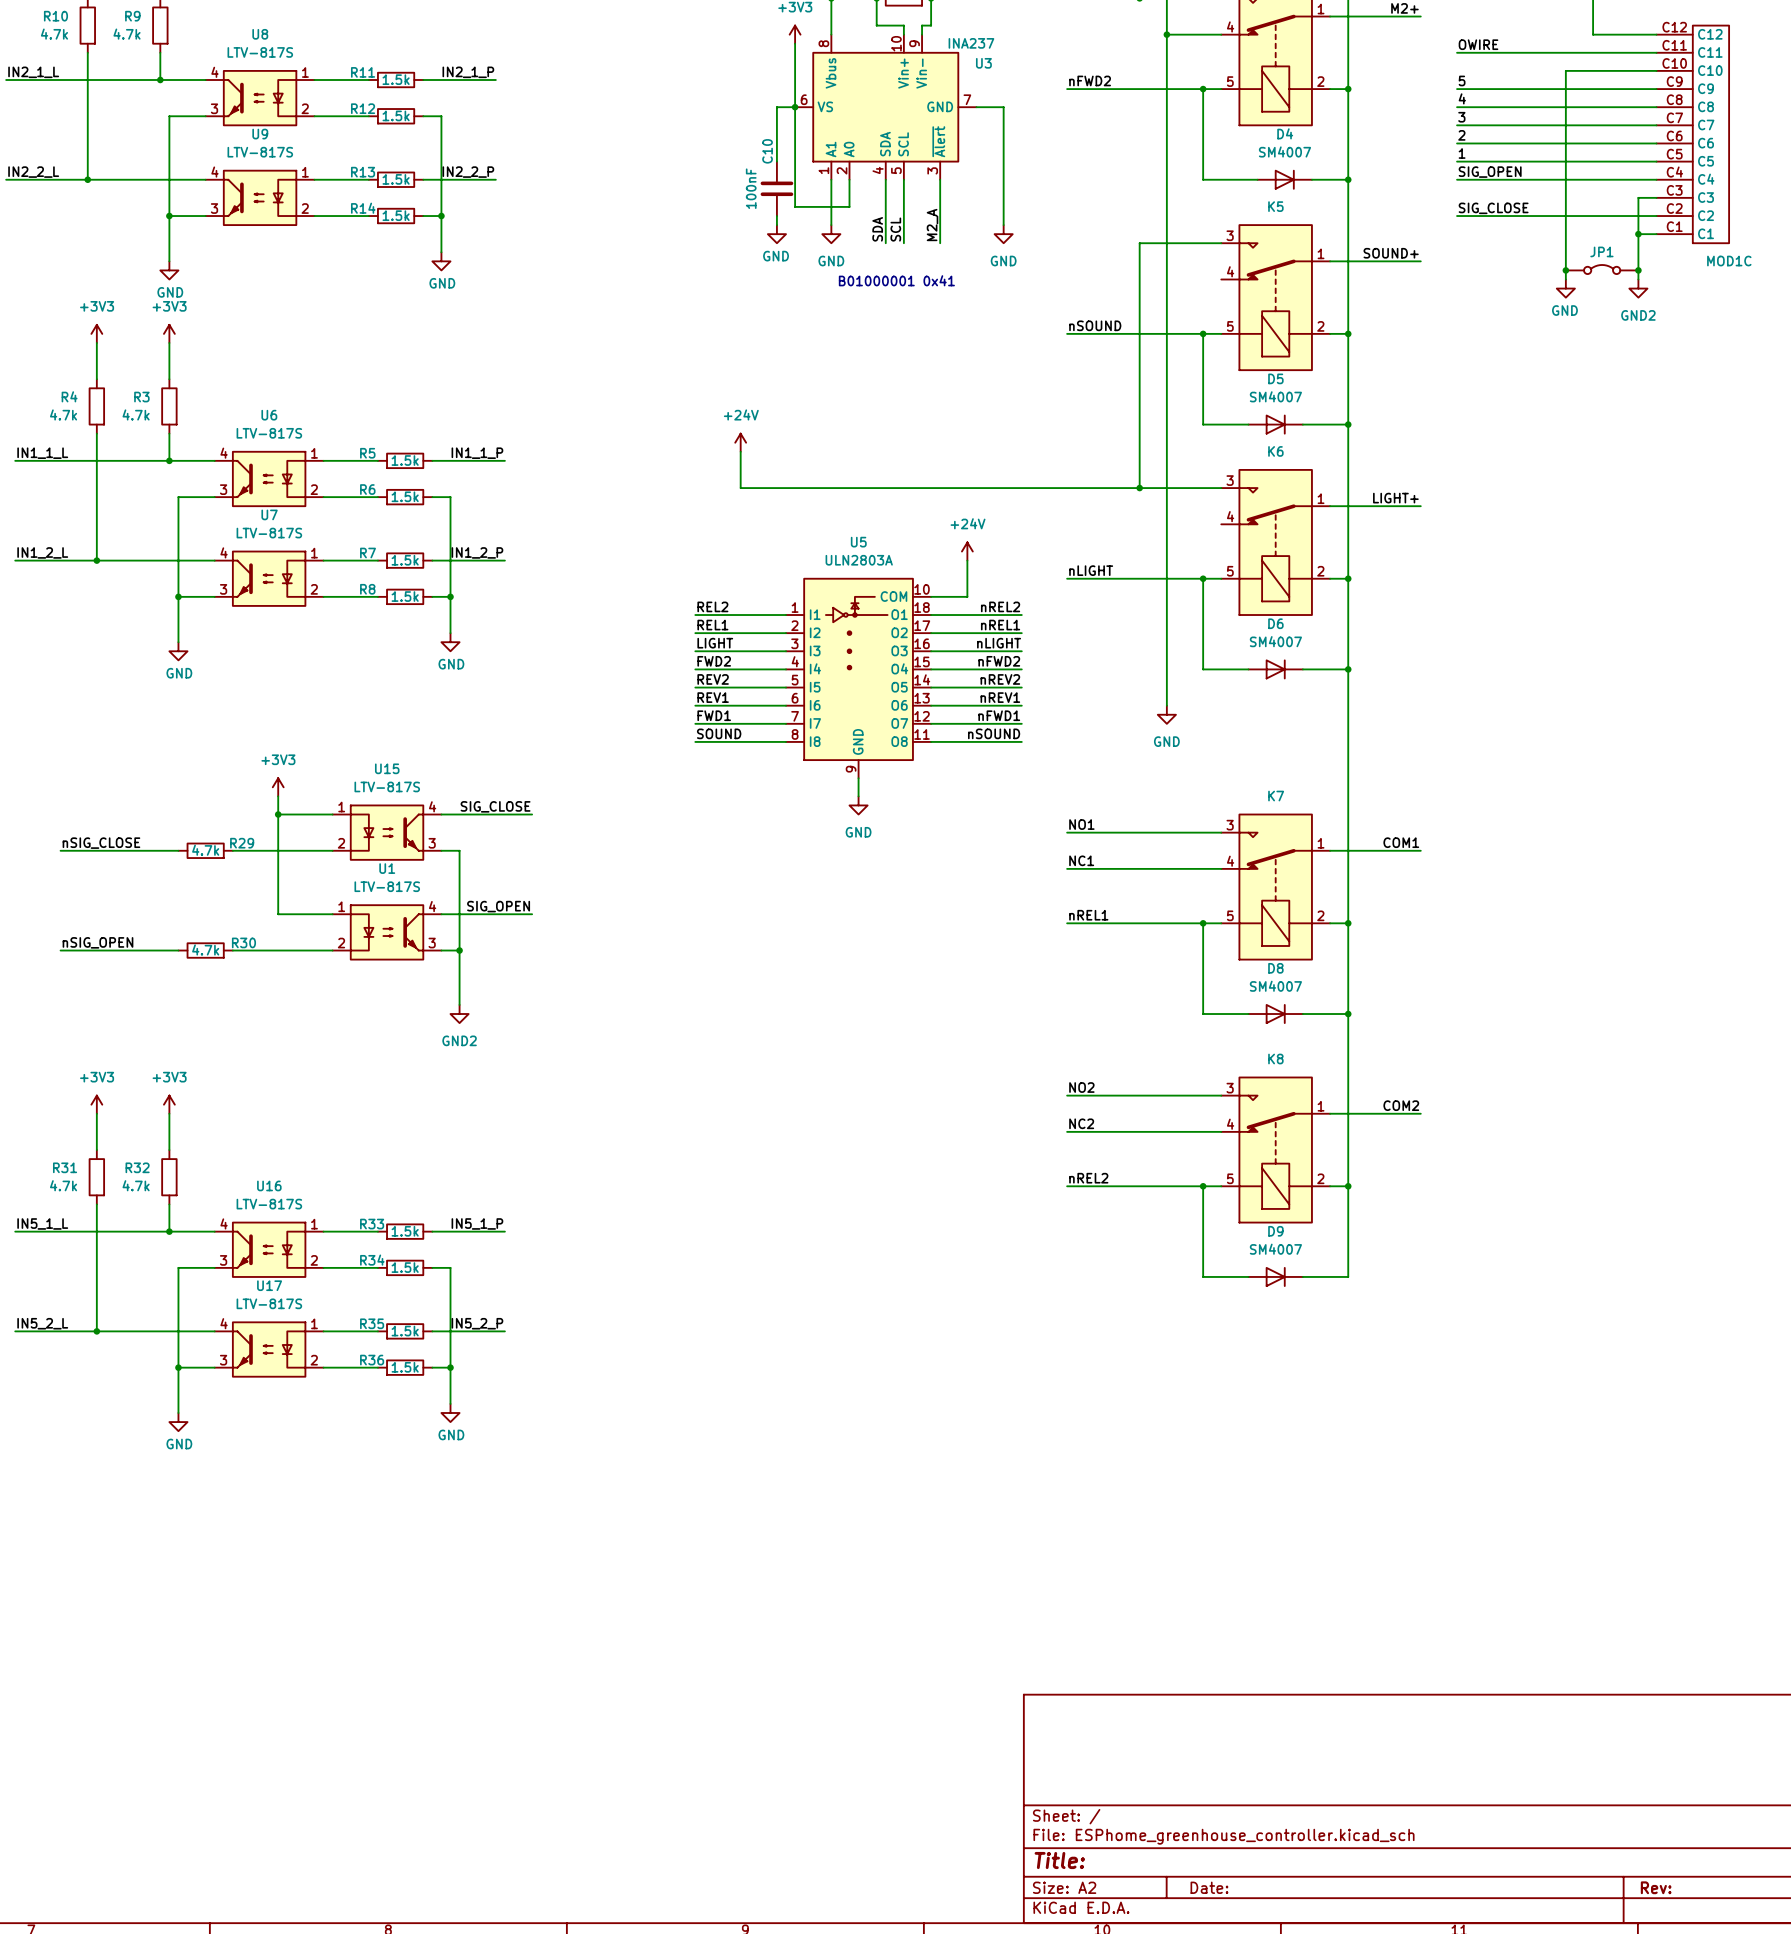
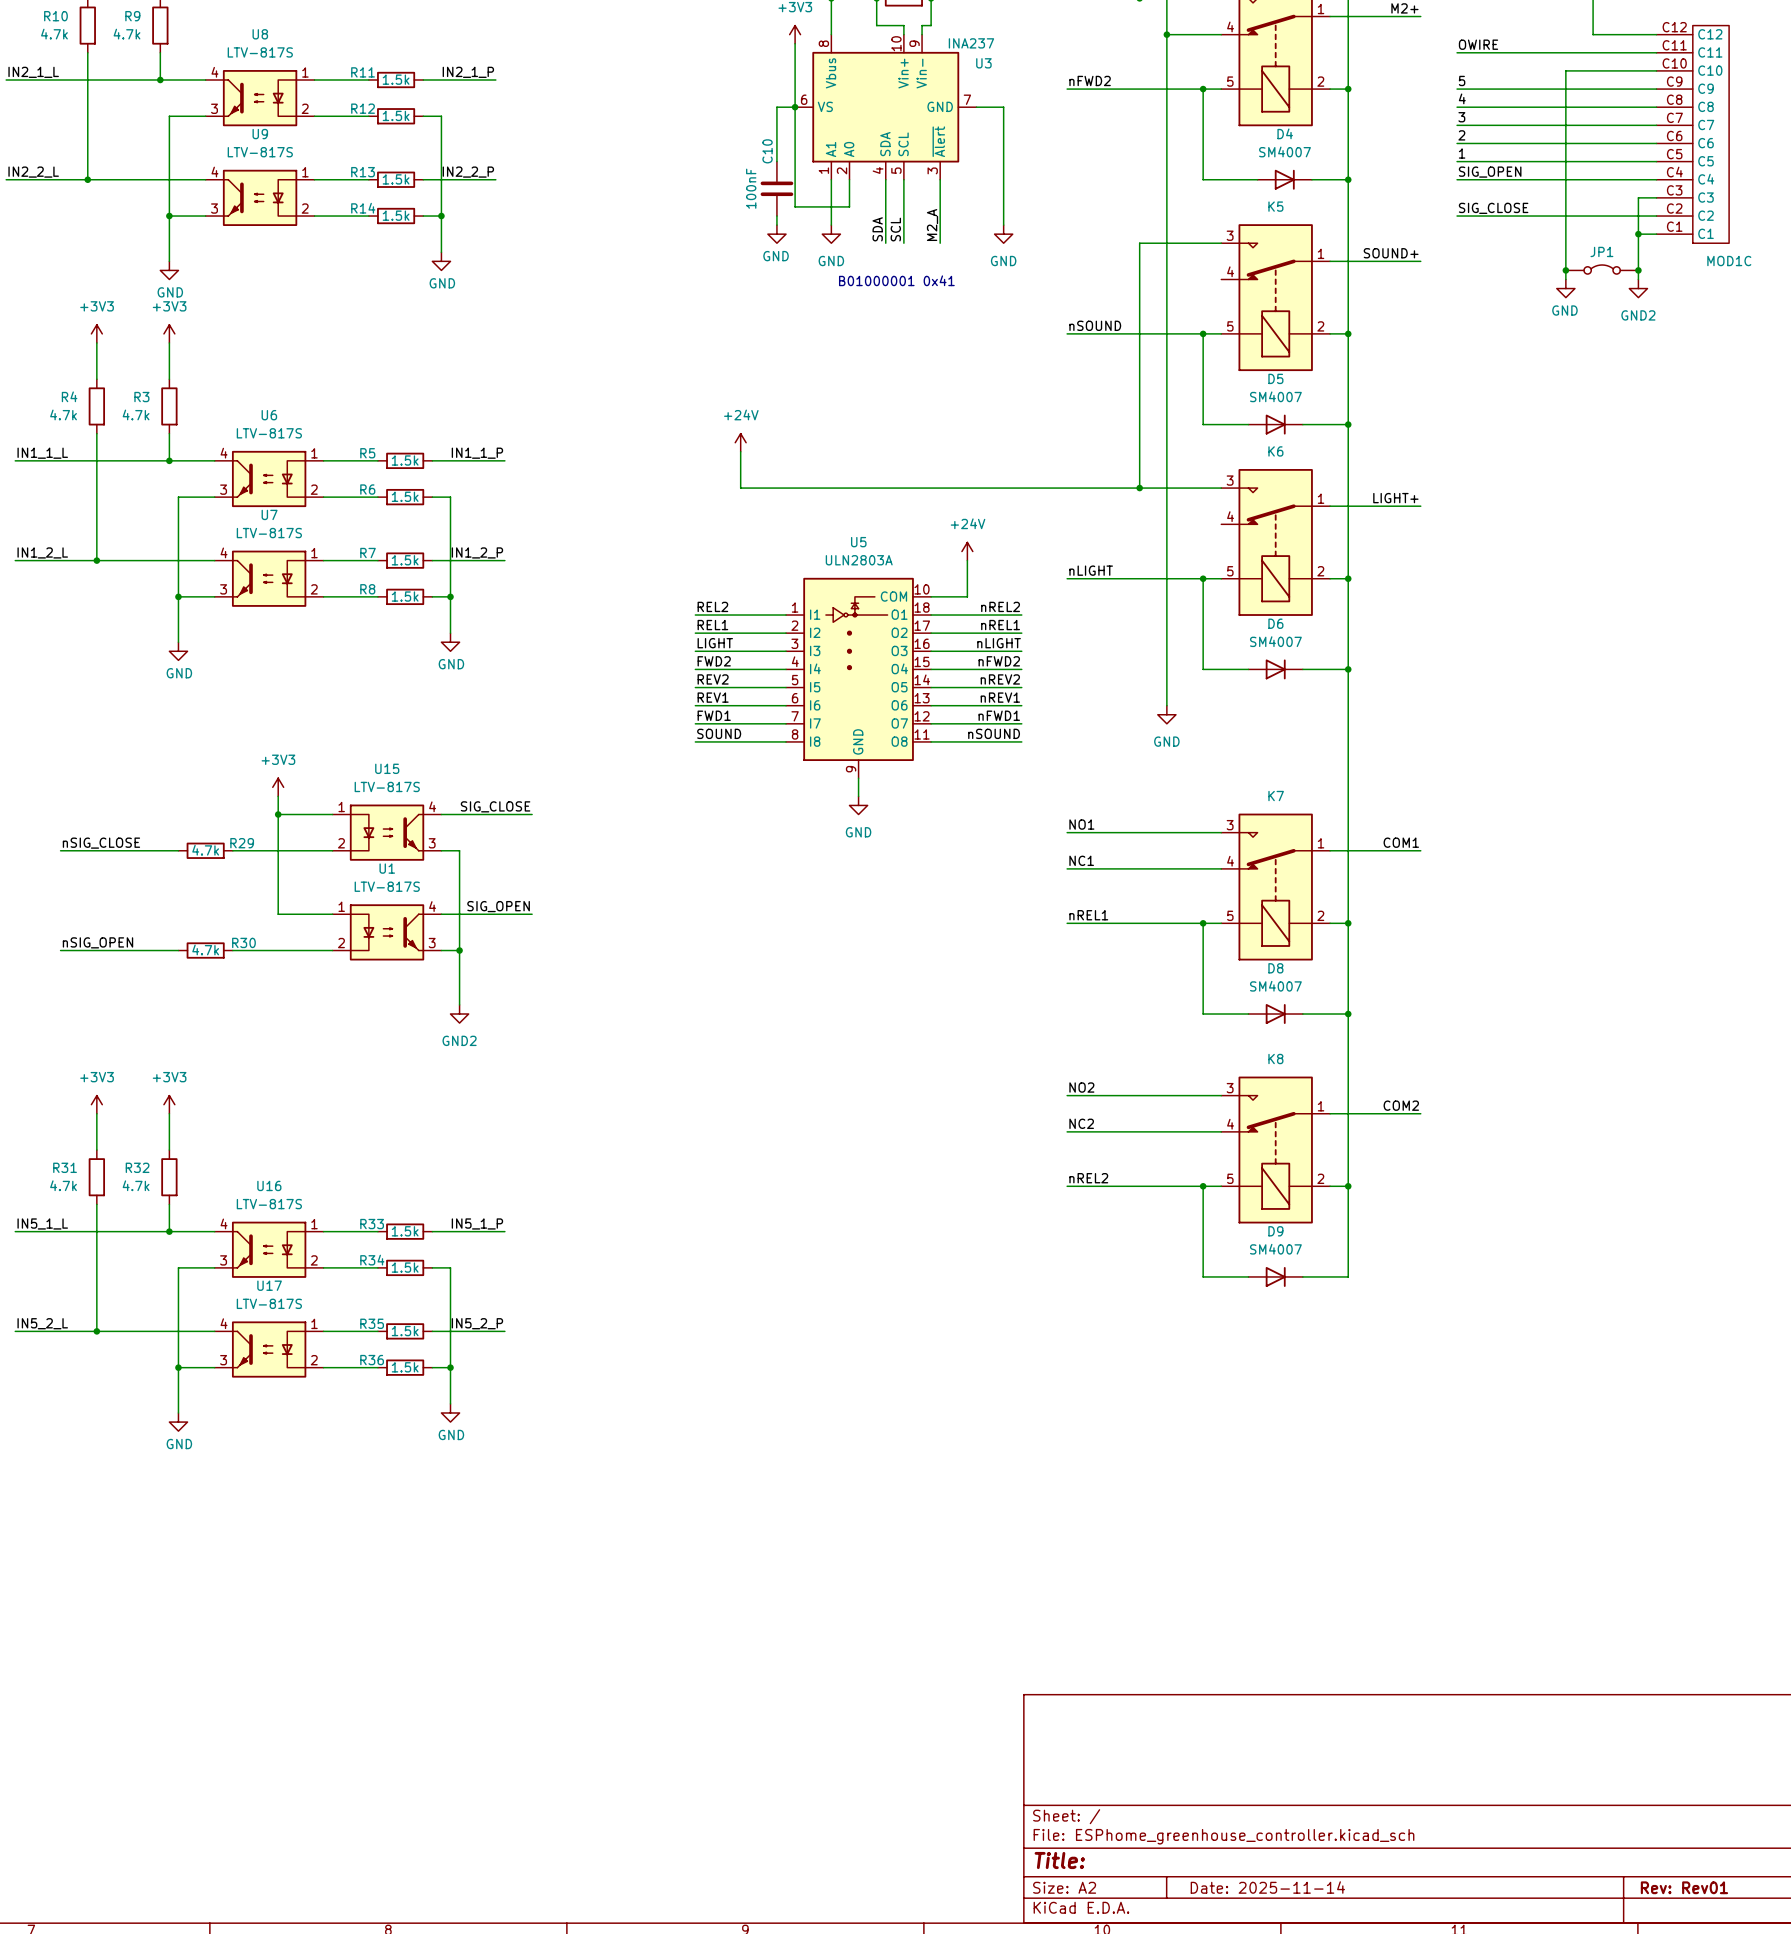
title block: Date: (1209, 1887) -> Date: 2025-11-14 (1267, 1887)
title block: Rev: (1656, 1887) -> Rev: Rev01 (1684, 1887)

